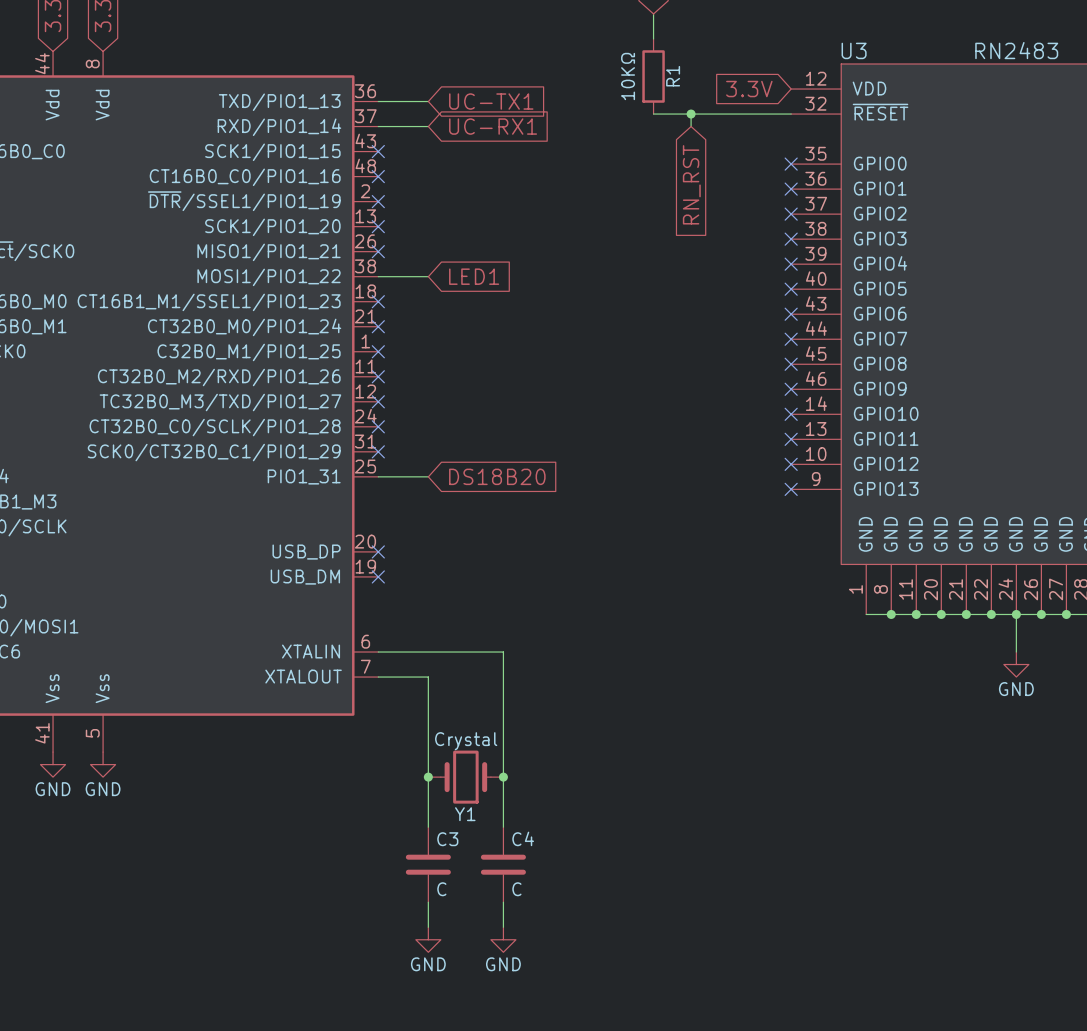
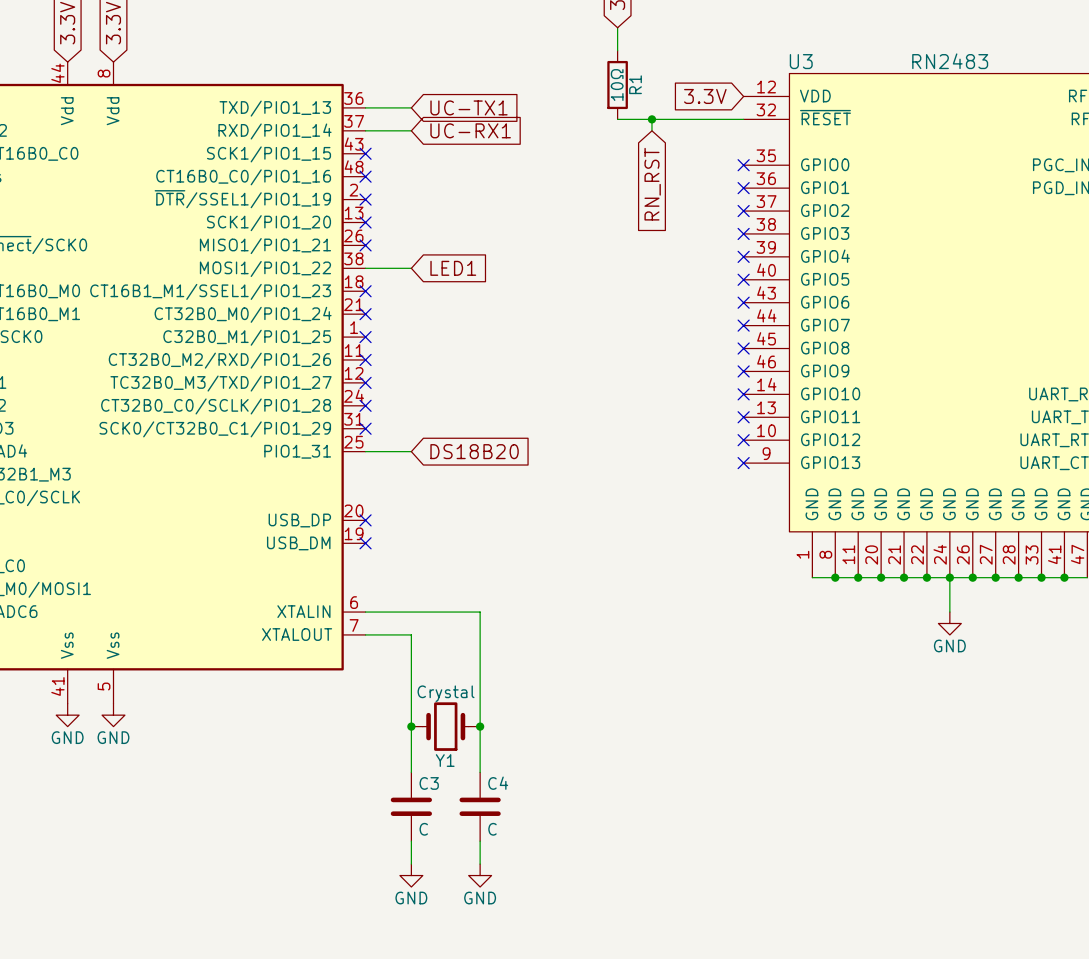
R1 value: 10KΩ (628, 76) -> 10Ω (617, 85)

